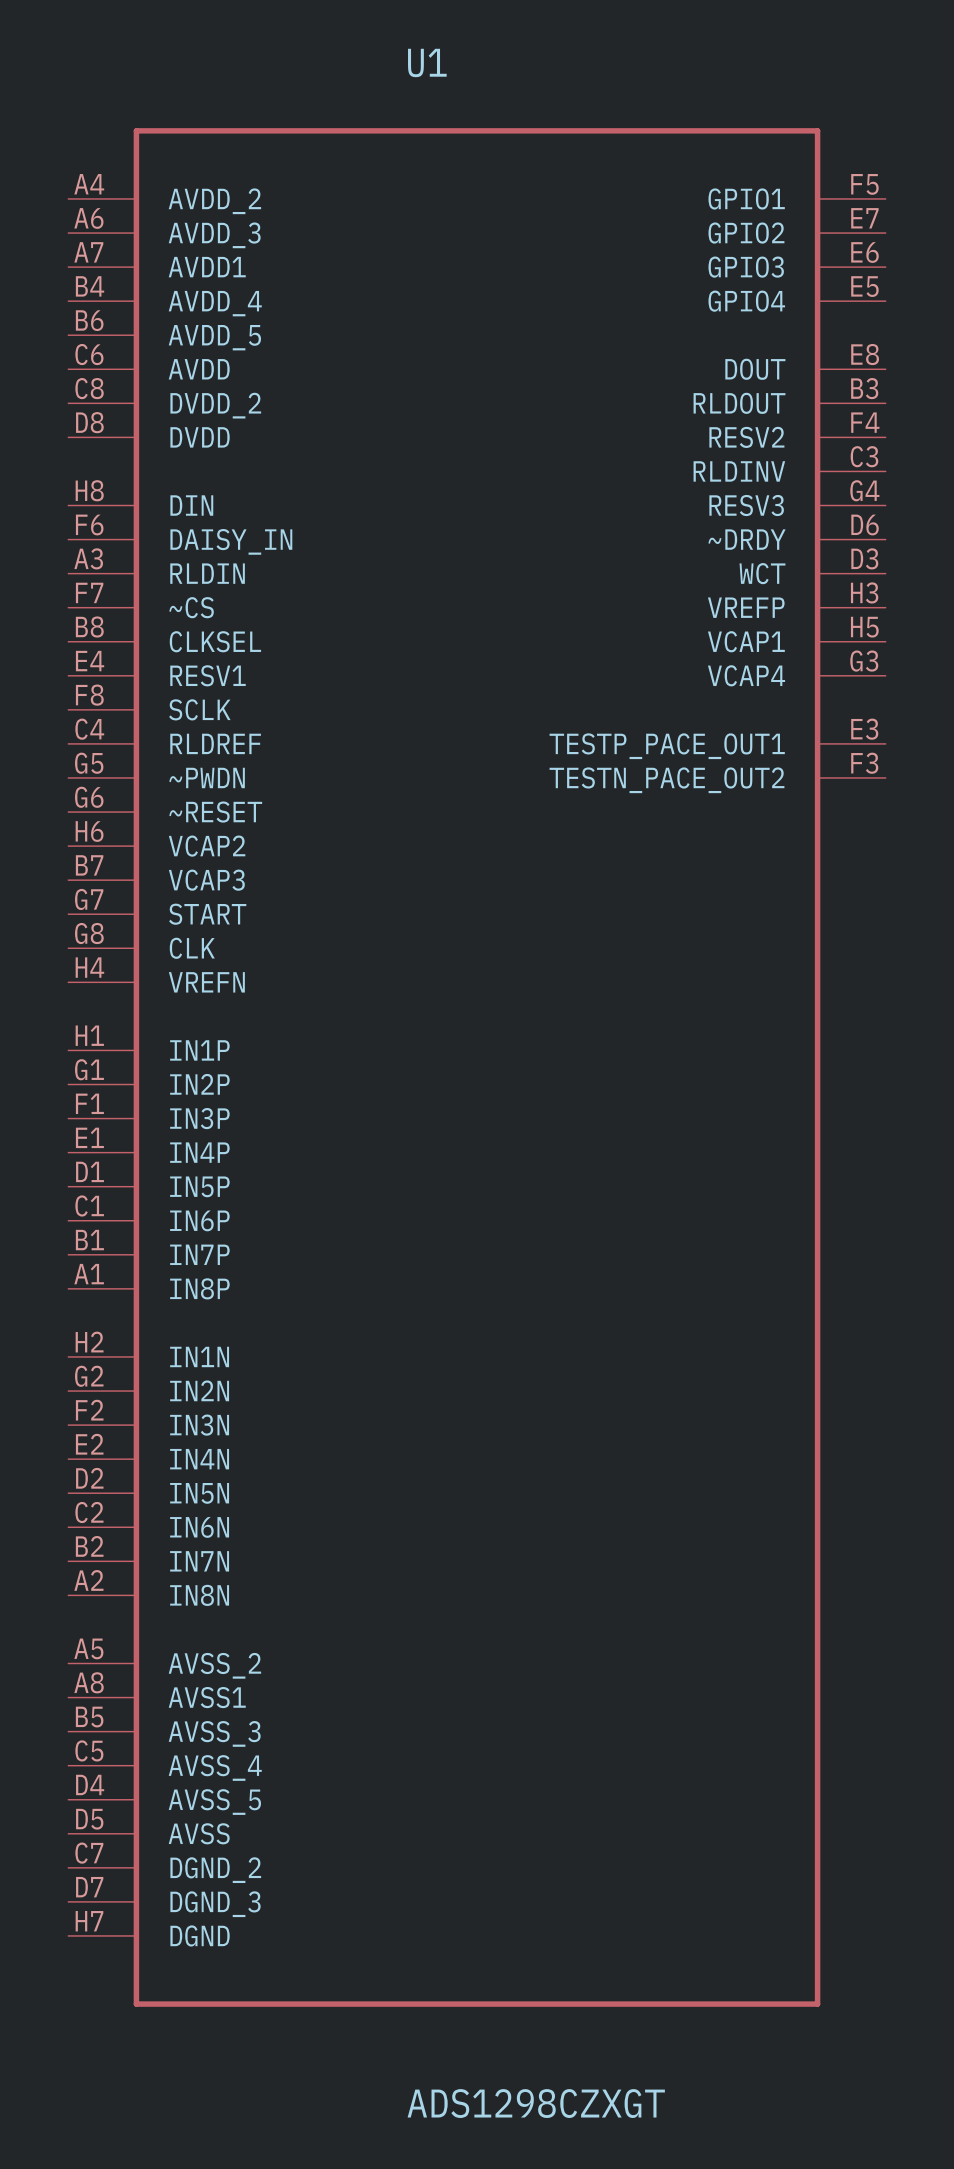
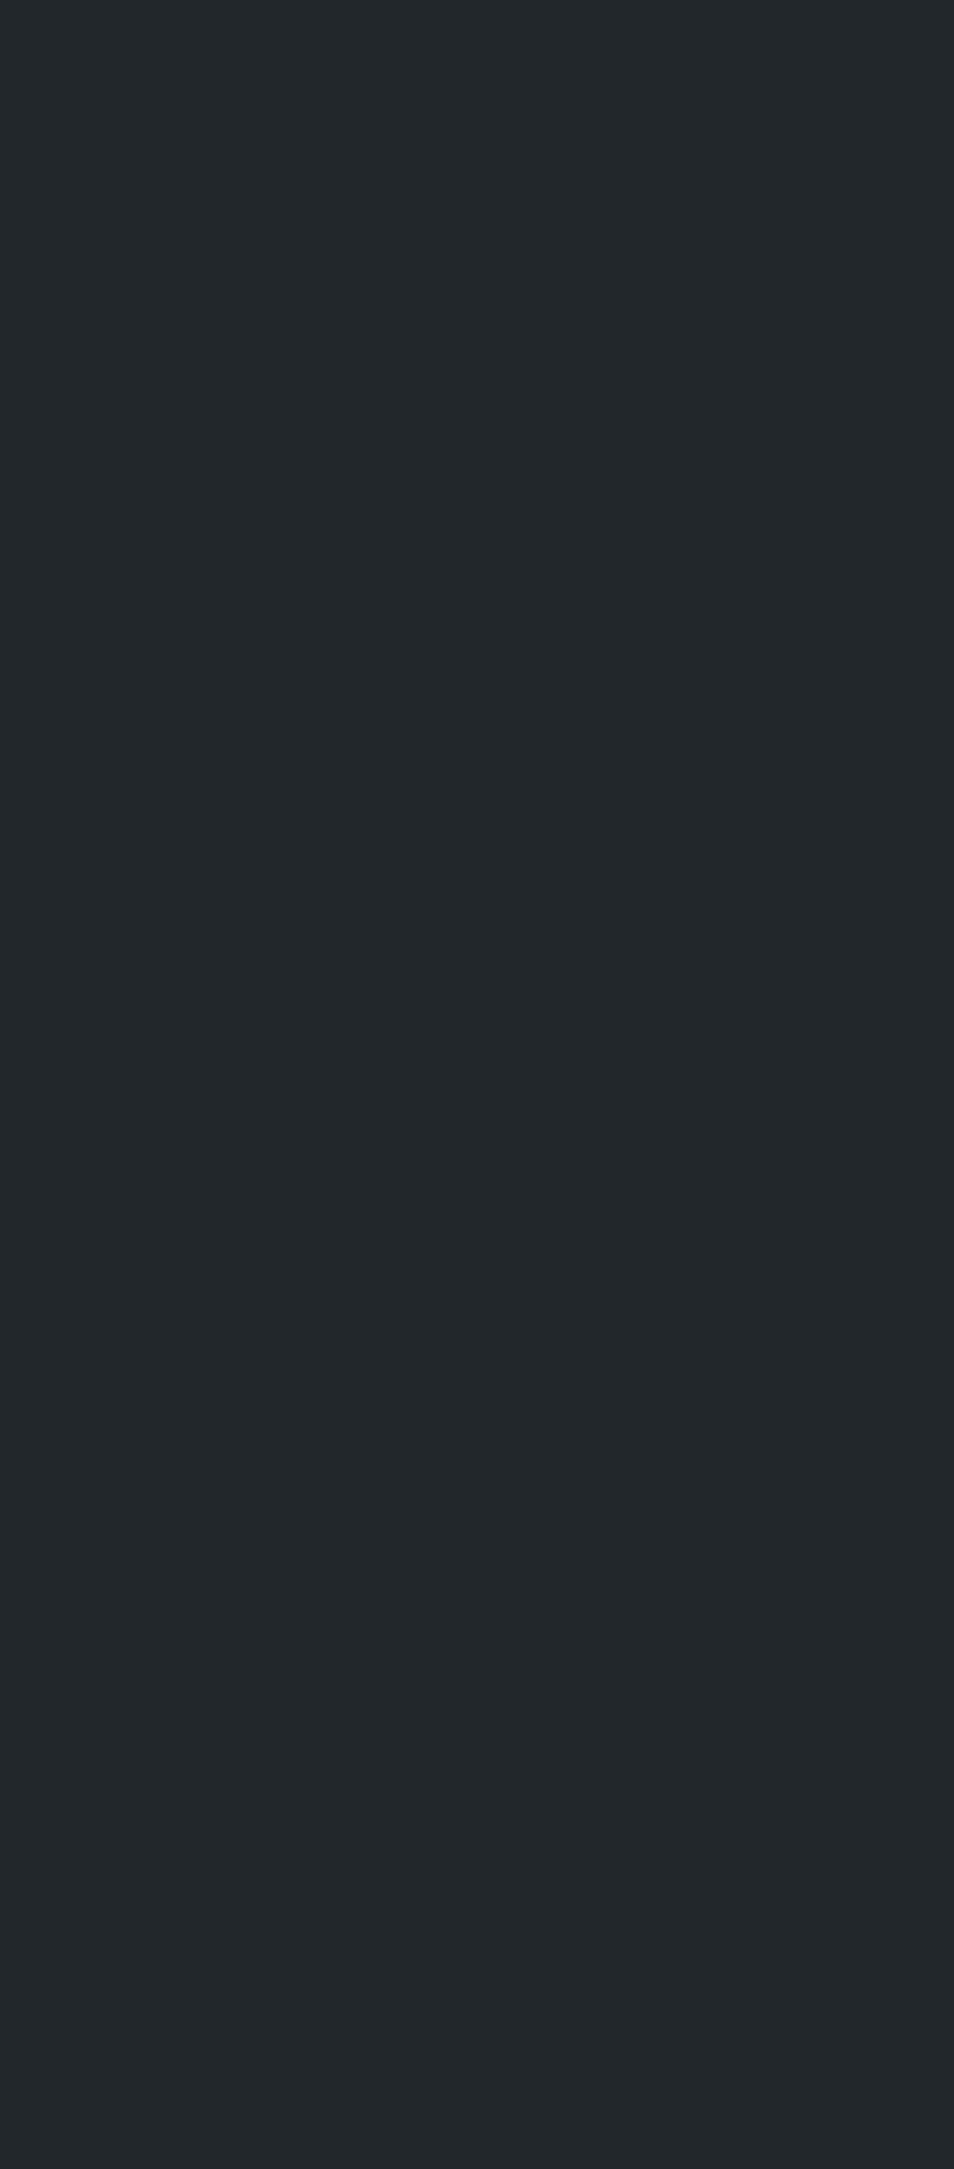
U1: ADS1298CZXGT (476, 1067) -> none

